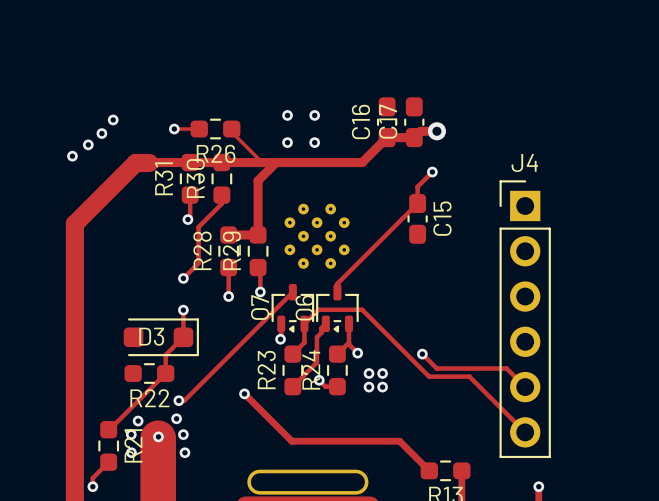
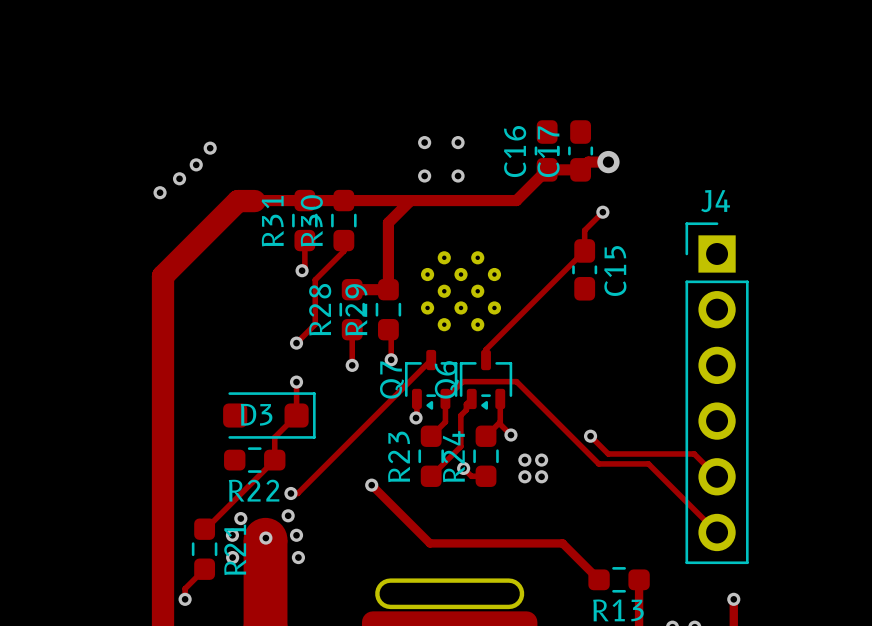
track: (174, 129) (199, 129) -> none
via: (174, 129) -> none
R26: (215, 129) -> none
track: (231, 129) (231, 132) (260, 162) -> none

